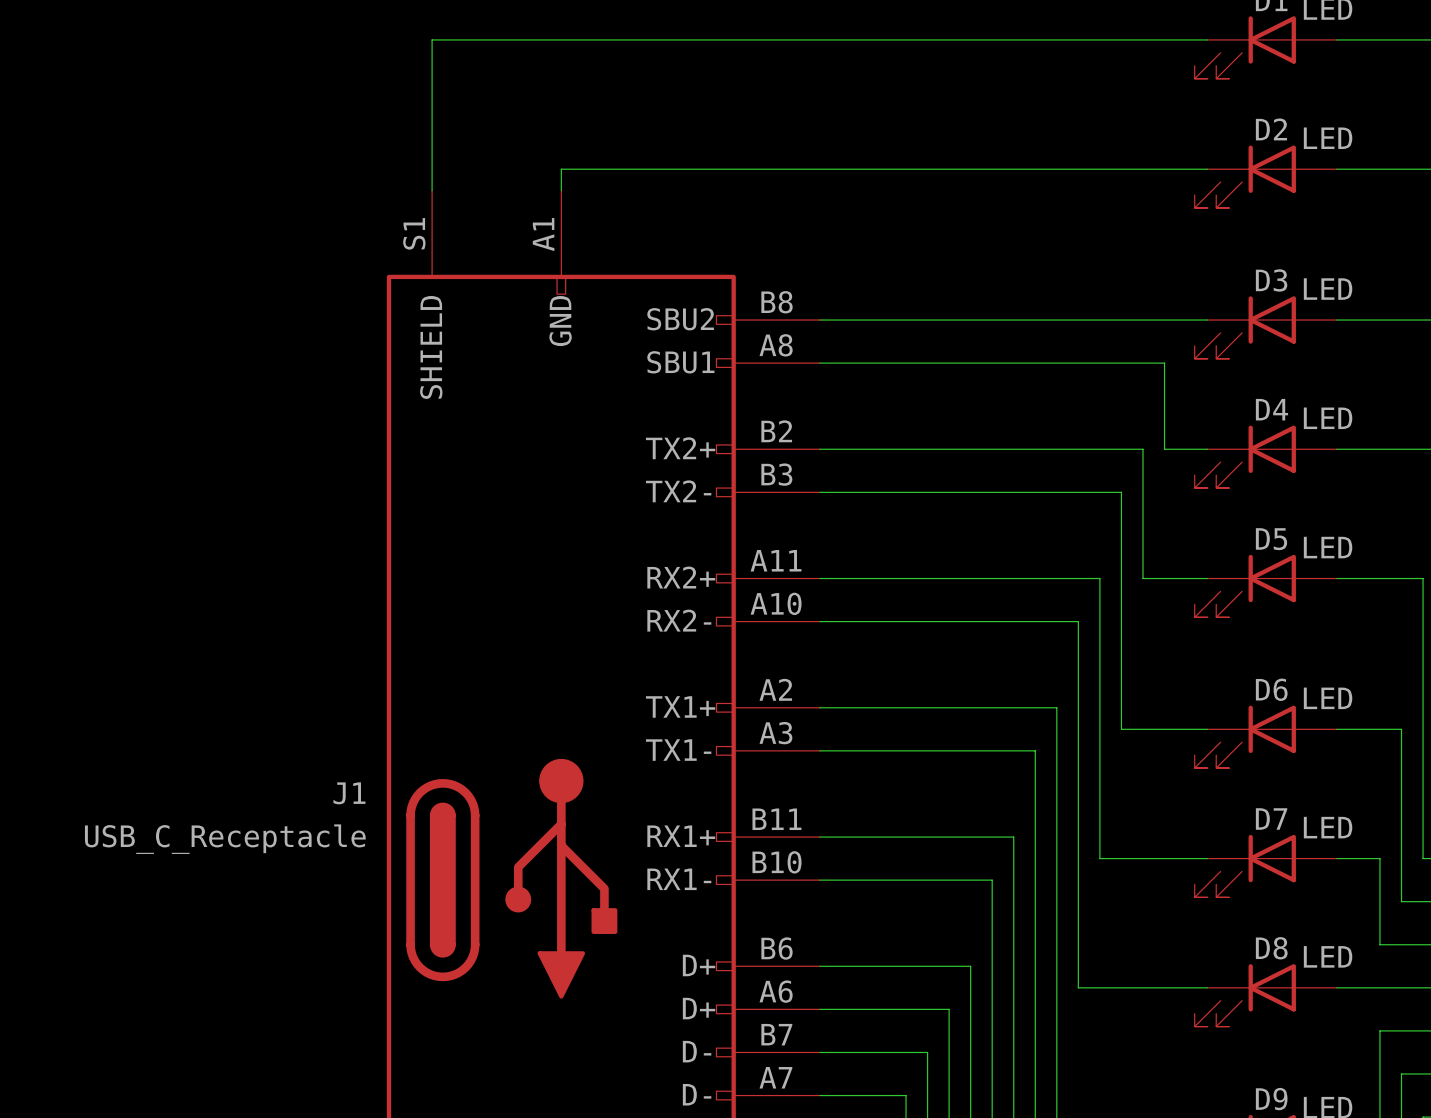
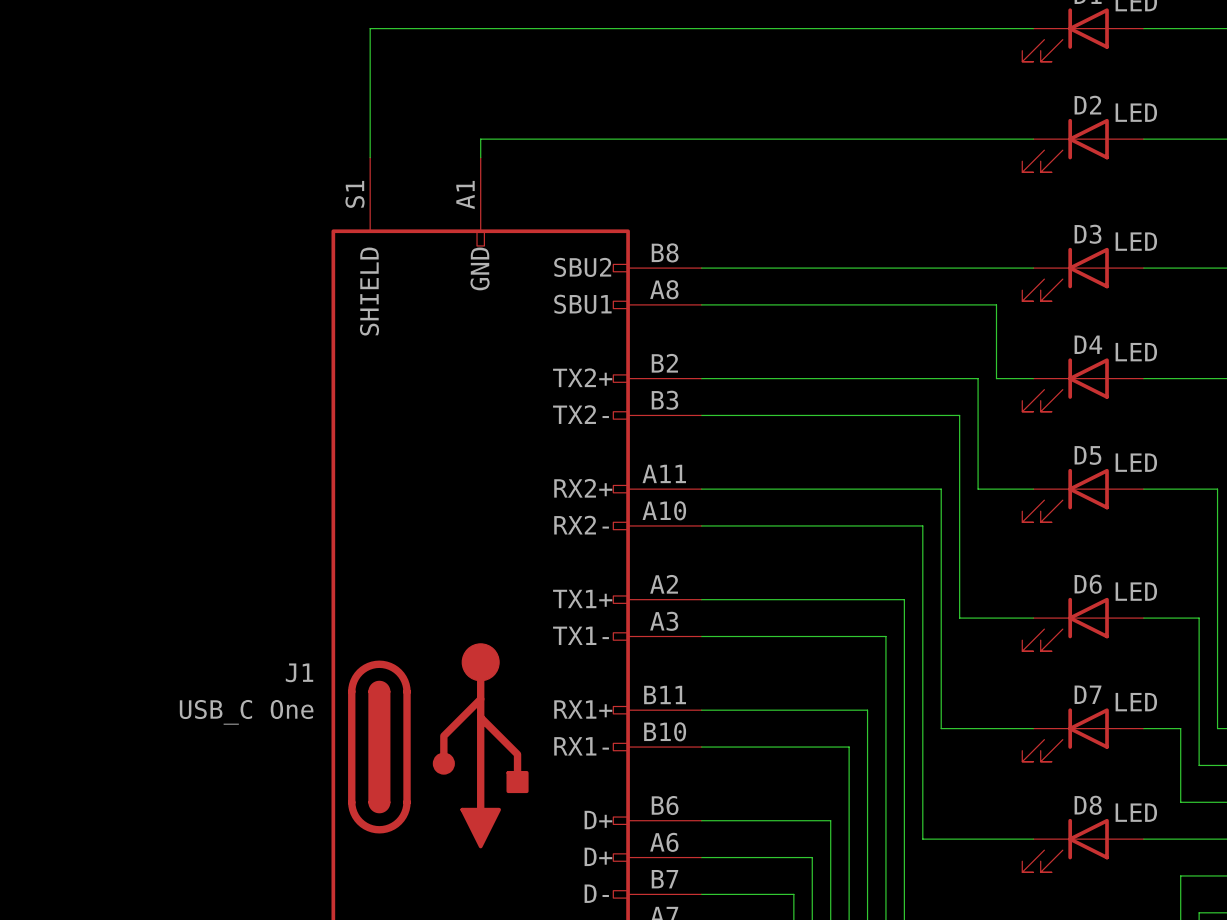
J1 value: USB_C_Receptacle (225, 839) -> USB_C One (246, 712)

